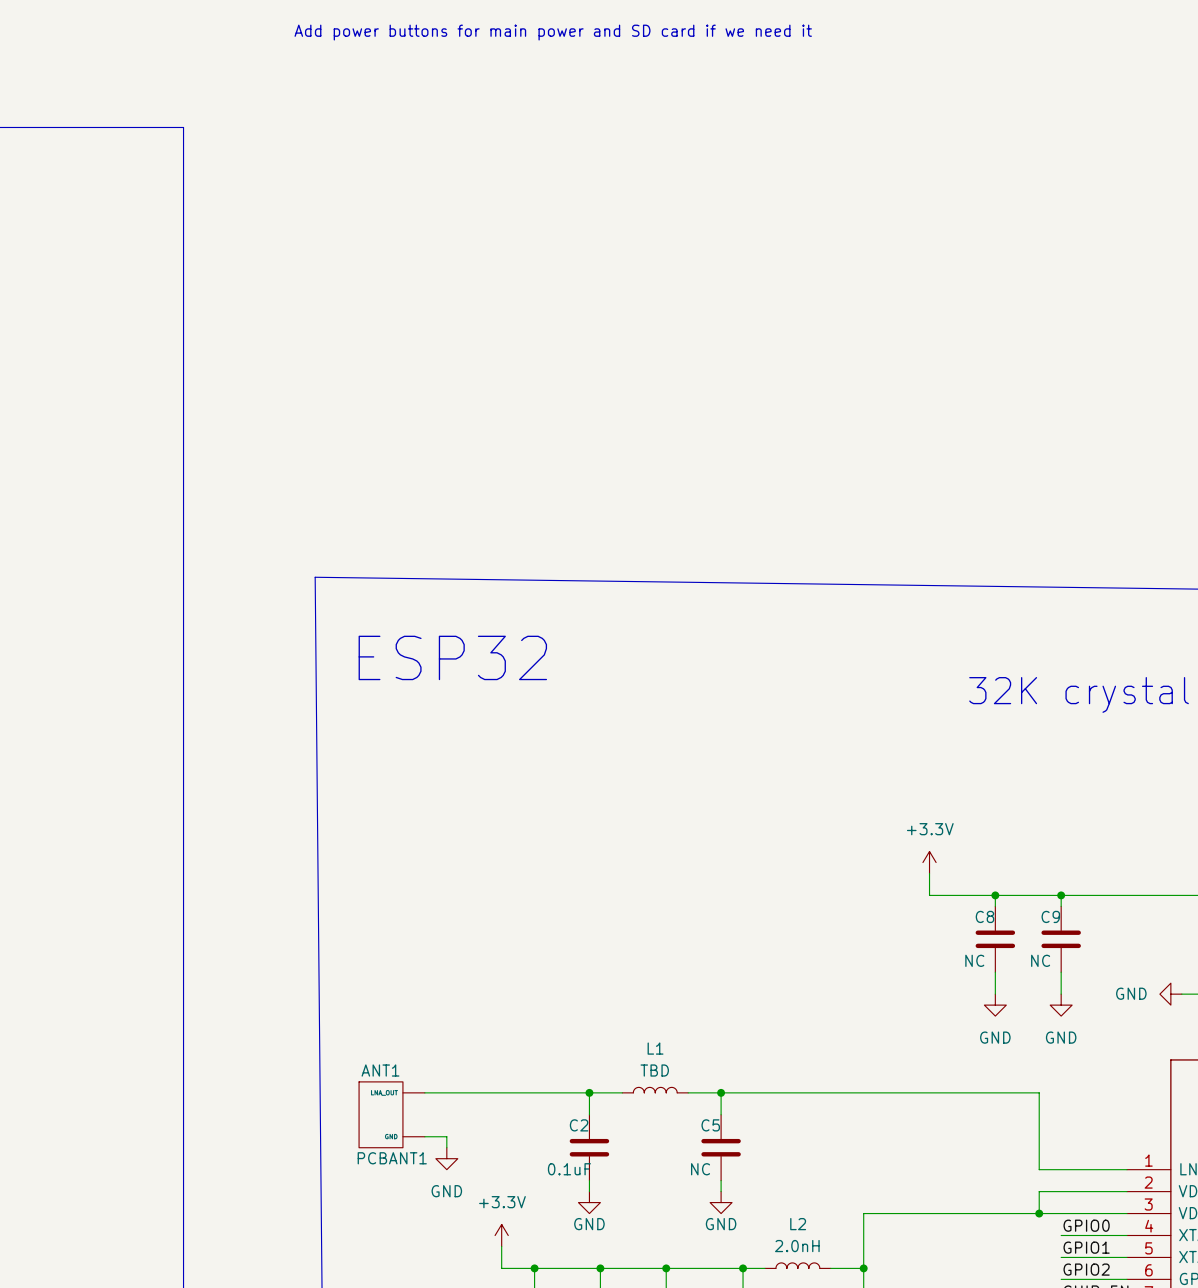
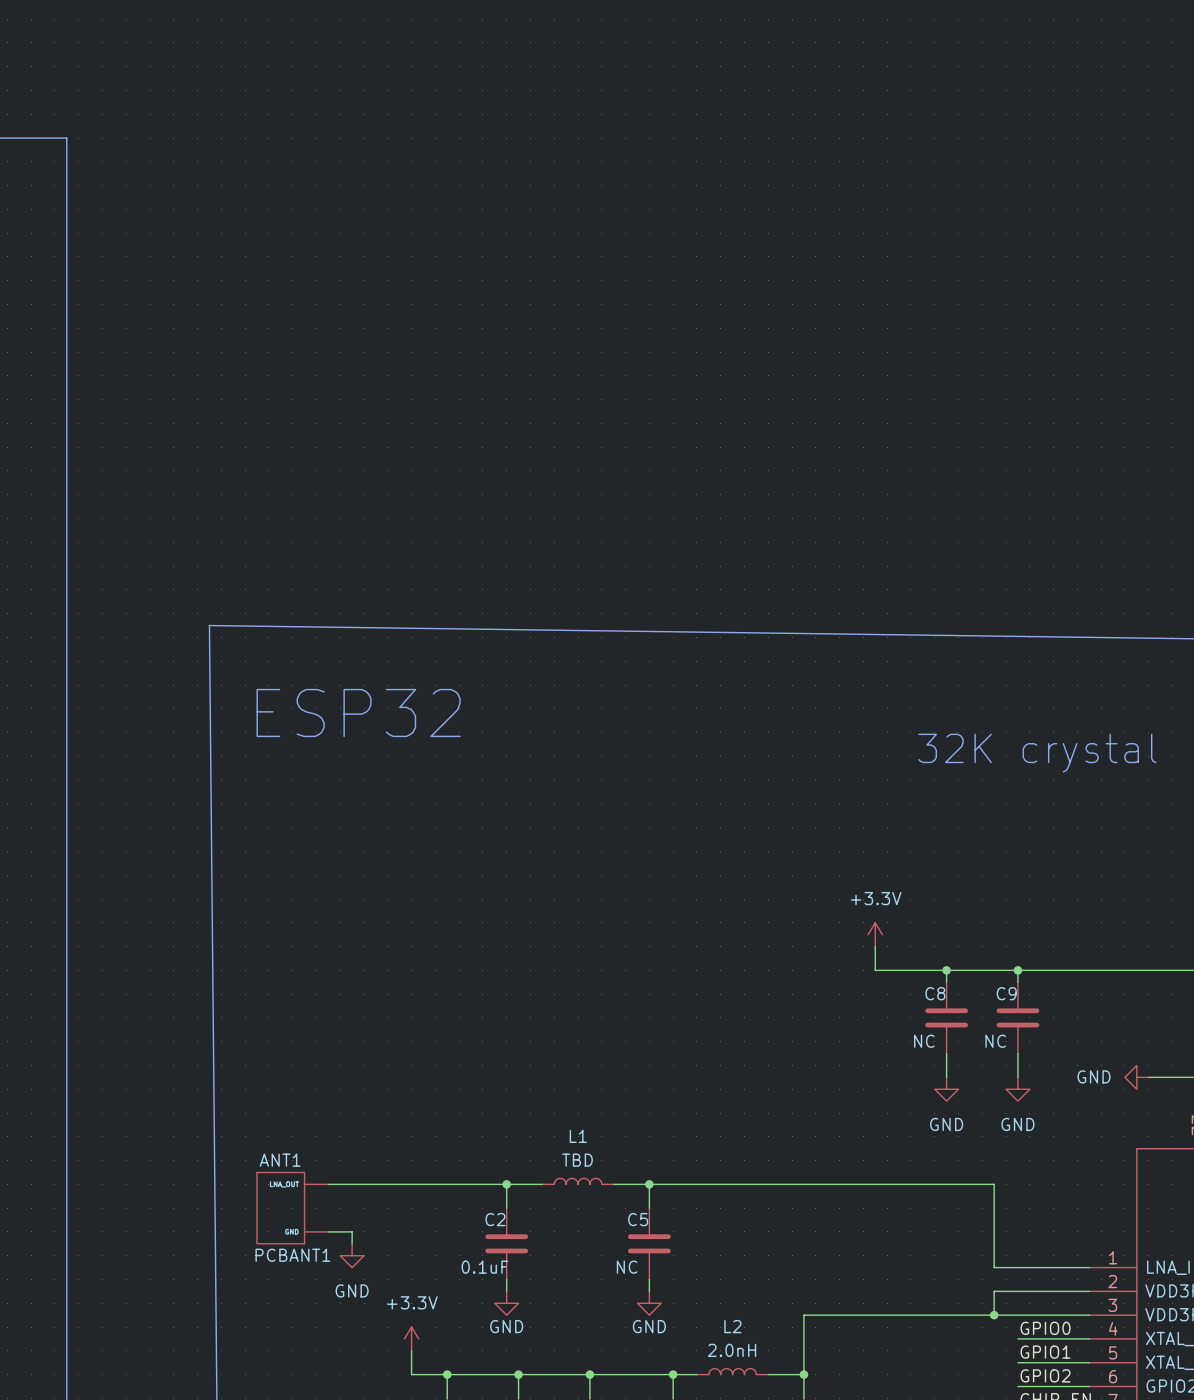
text: Add power buttons for main power and SD card if we need it (553, 32) -> none

